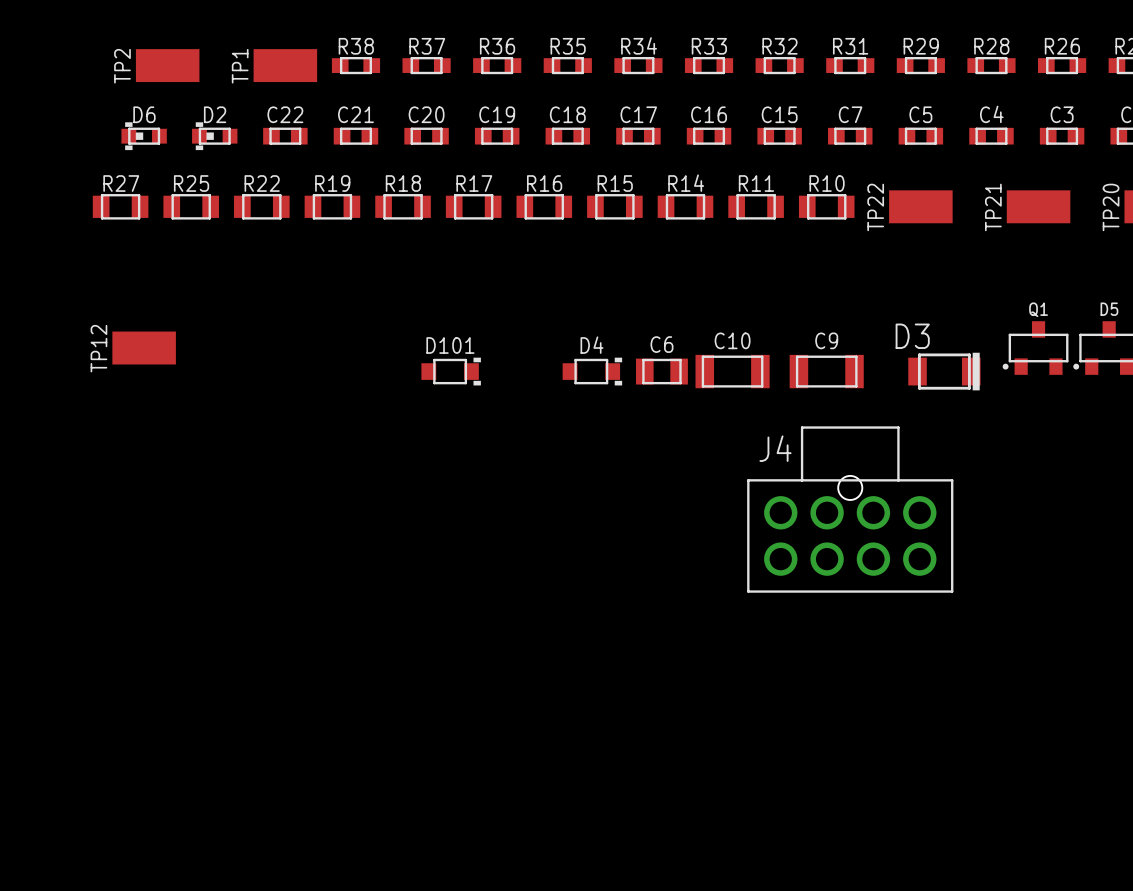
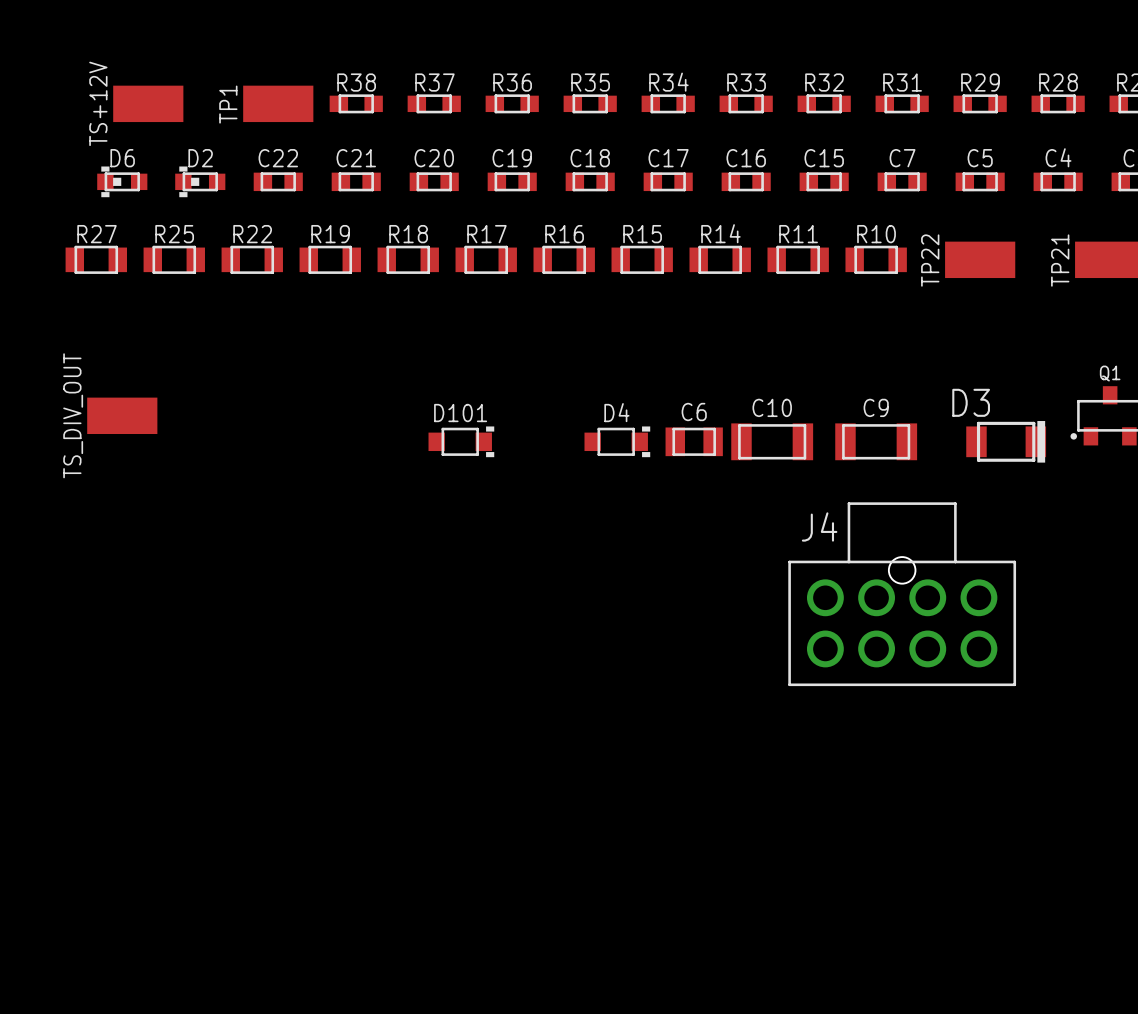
TP2 name: TP2 (122, 66) -> TS+12V (98, 103)
TP12 name: TP12 (98, 348) -> TS_DIV_OUT (73, 415)

